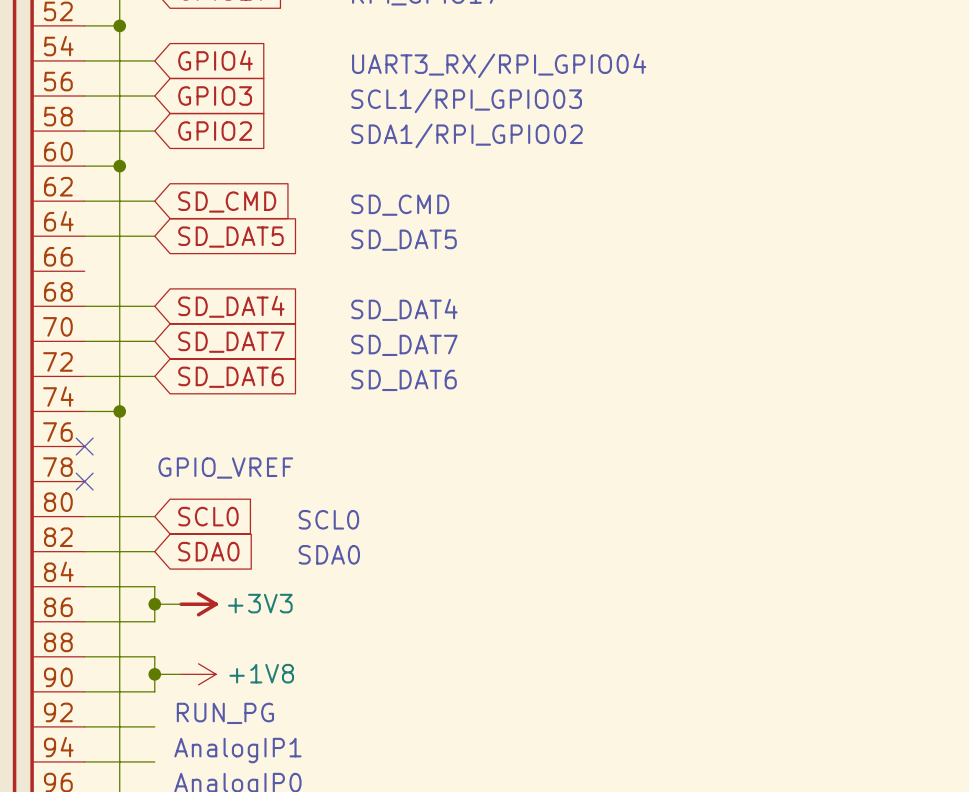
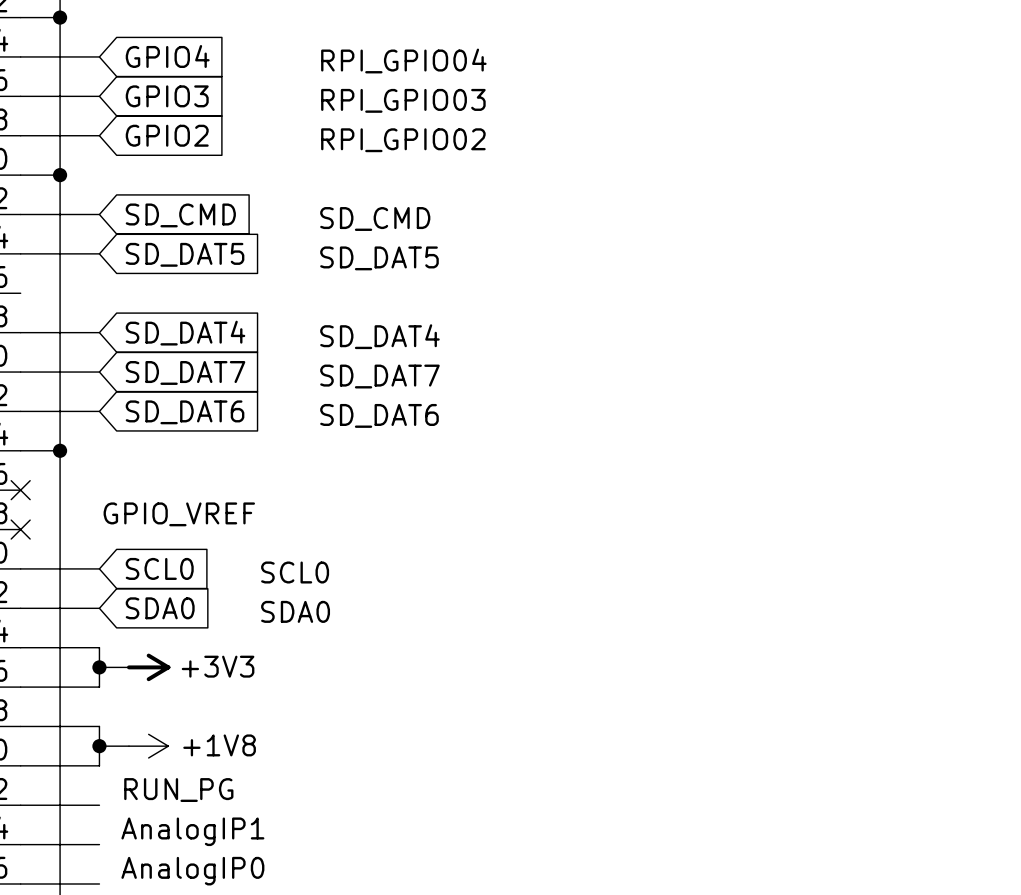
text: UART3_RX/RPI_GPIO04 (499, 65) -> RPI_GPIO04 (403, 60)
text: SCL1/RPI_GPIO03 (466, 100) -> RPI_GPIO03 (403, 100)
text: SDA1/RPI_GPIO02 (467, 135) -> RPI_GPIO02 (403, 140)

